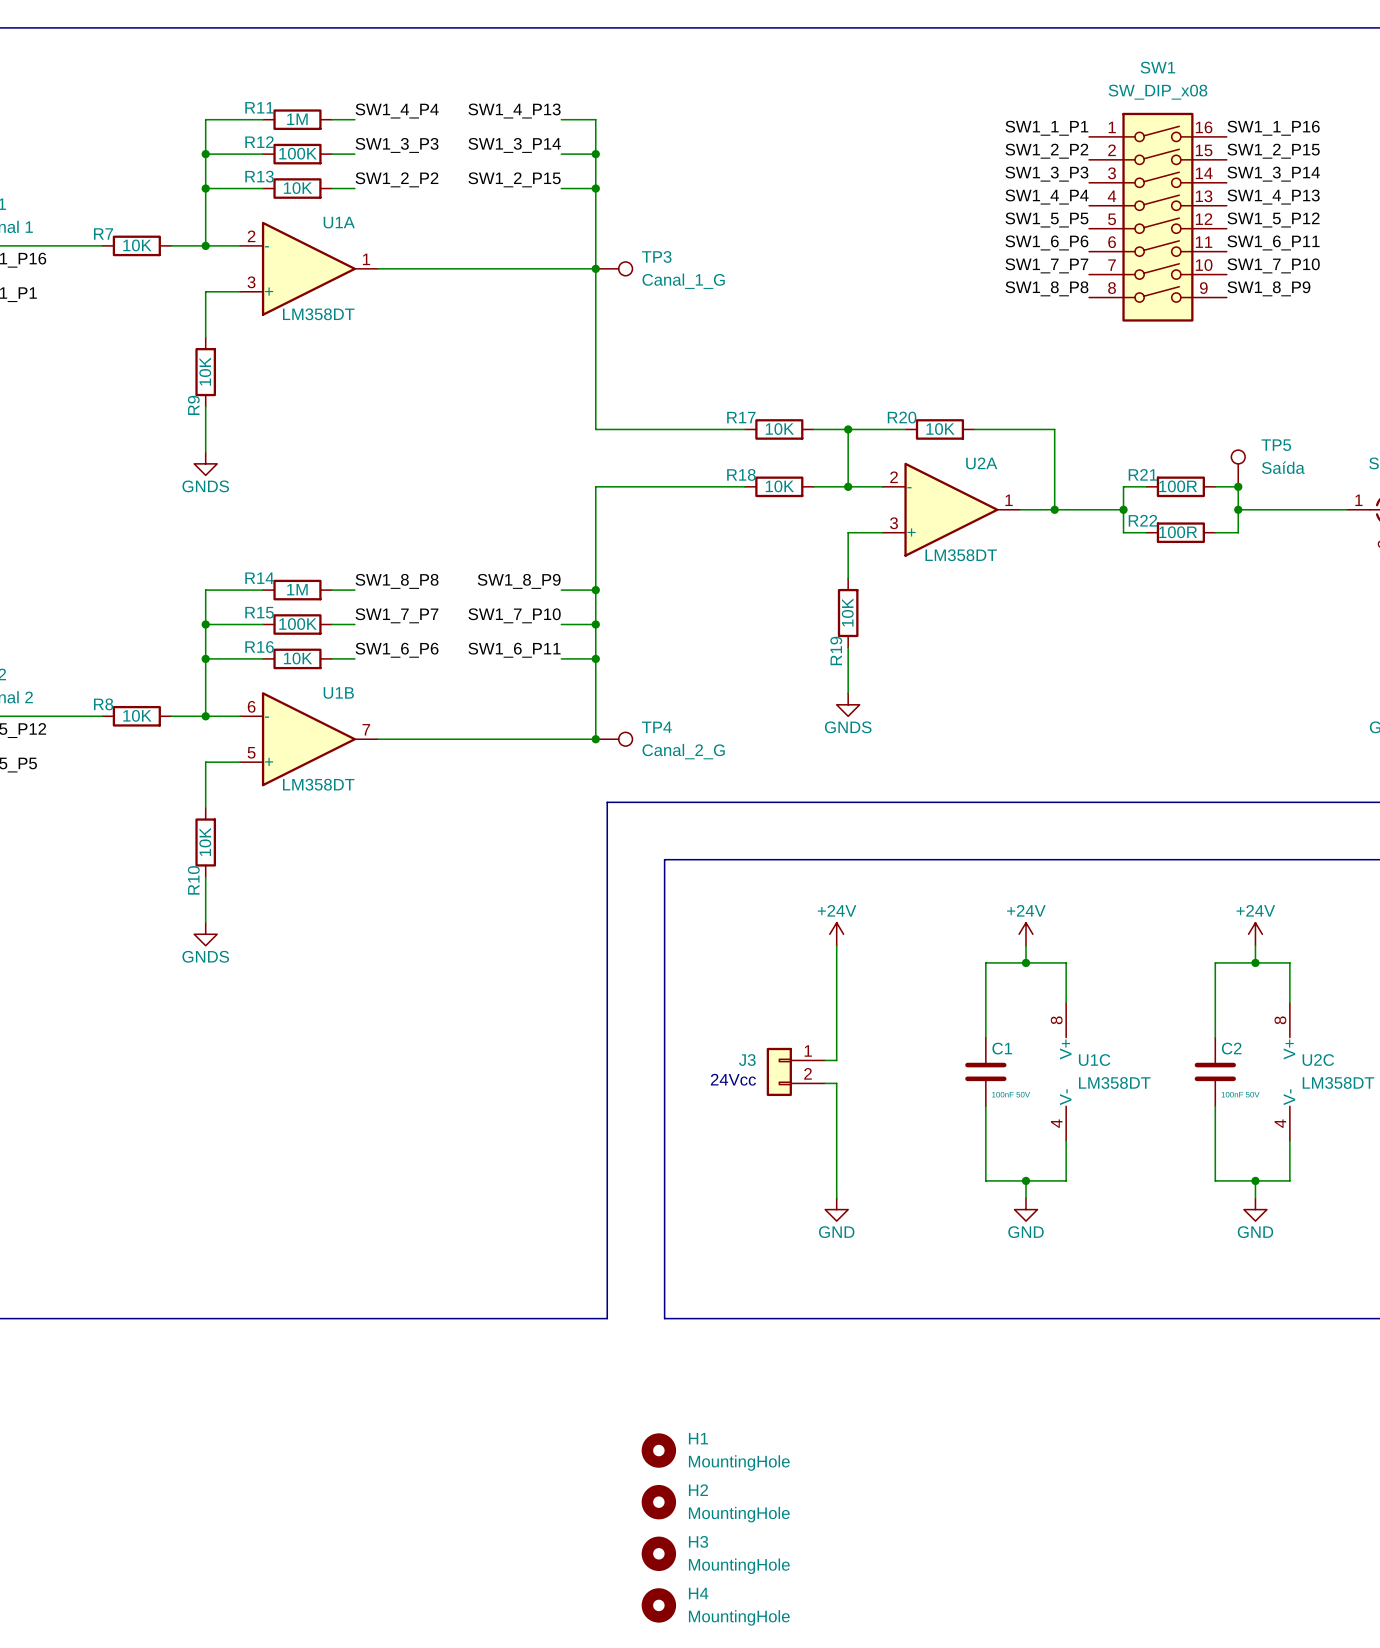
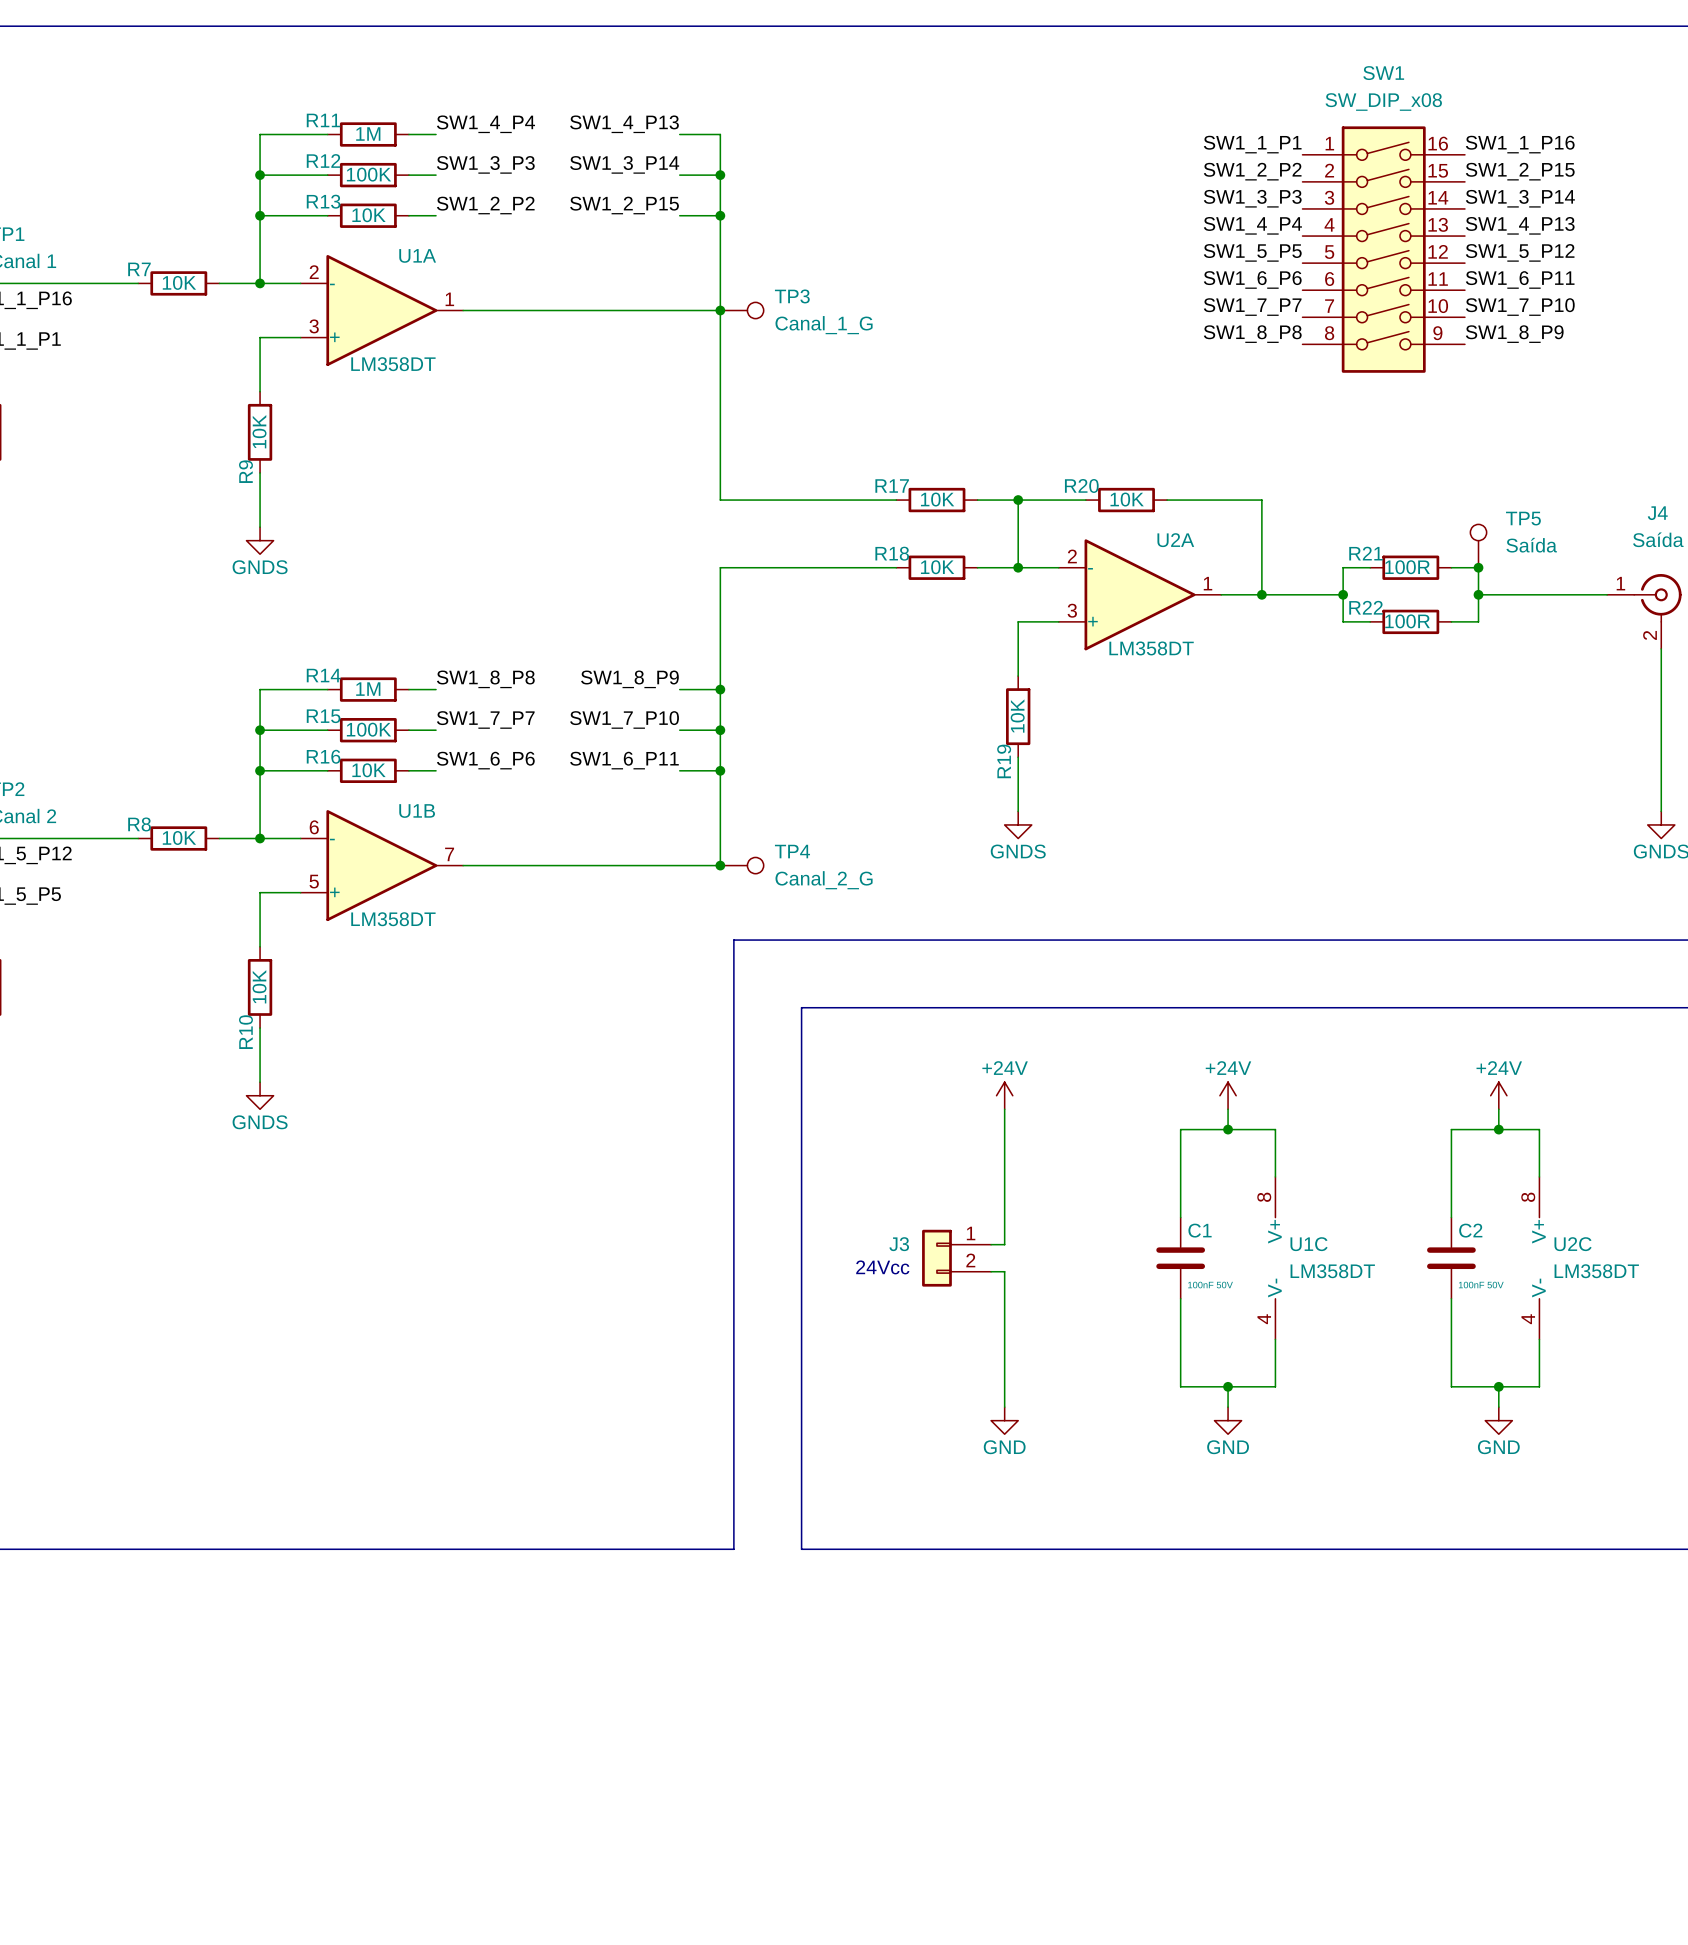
H1: MountingHole (658, 1450) -> none
H2: MountingHole (658, 1502) -> none
H3: MountingHole (658, 1553) -> none
H4: MountingHole (658, 1605) -> none

